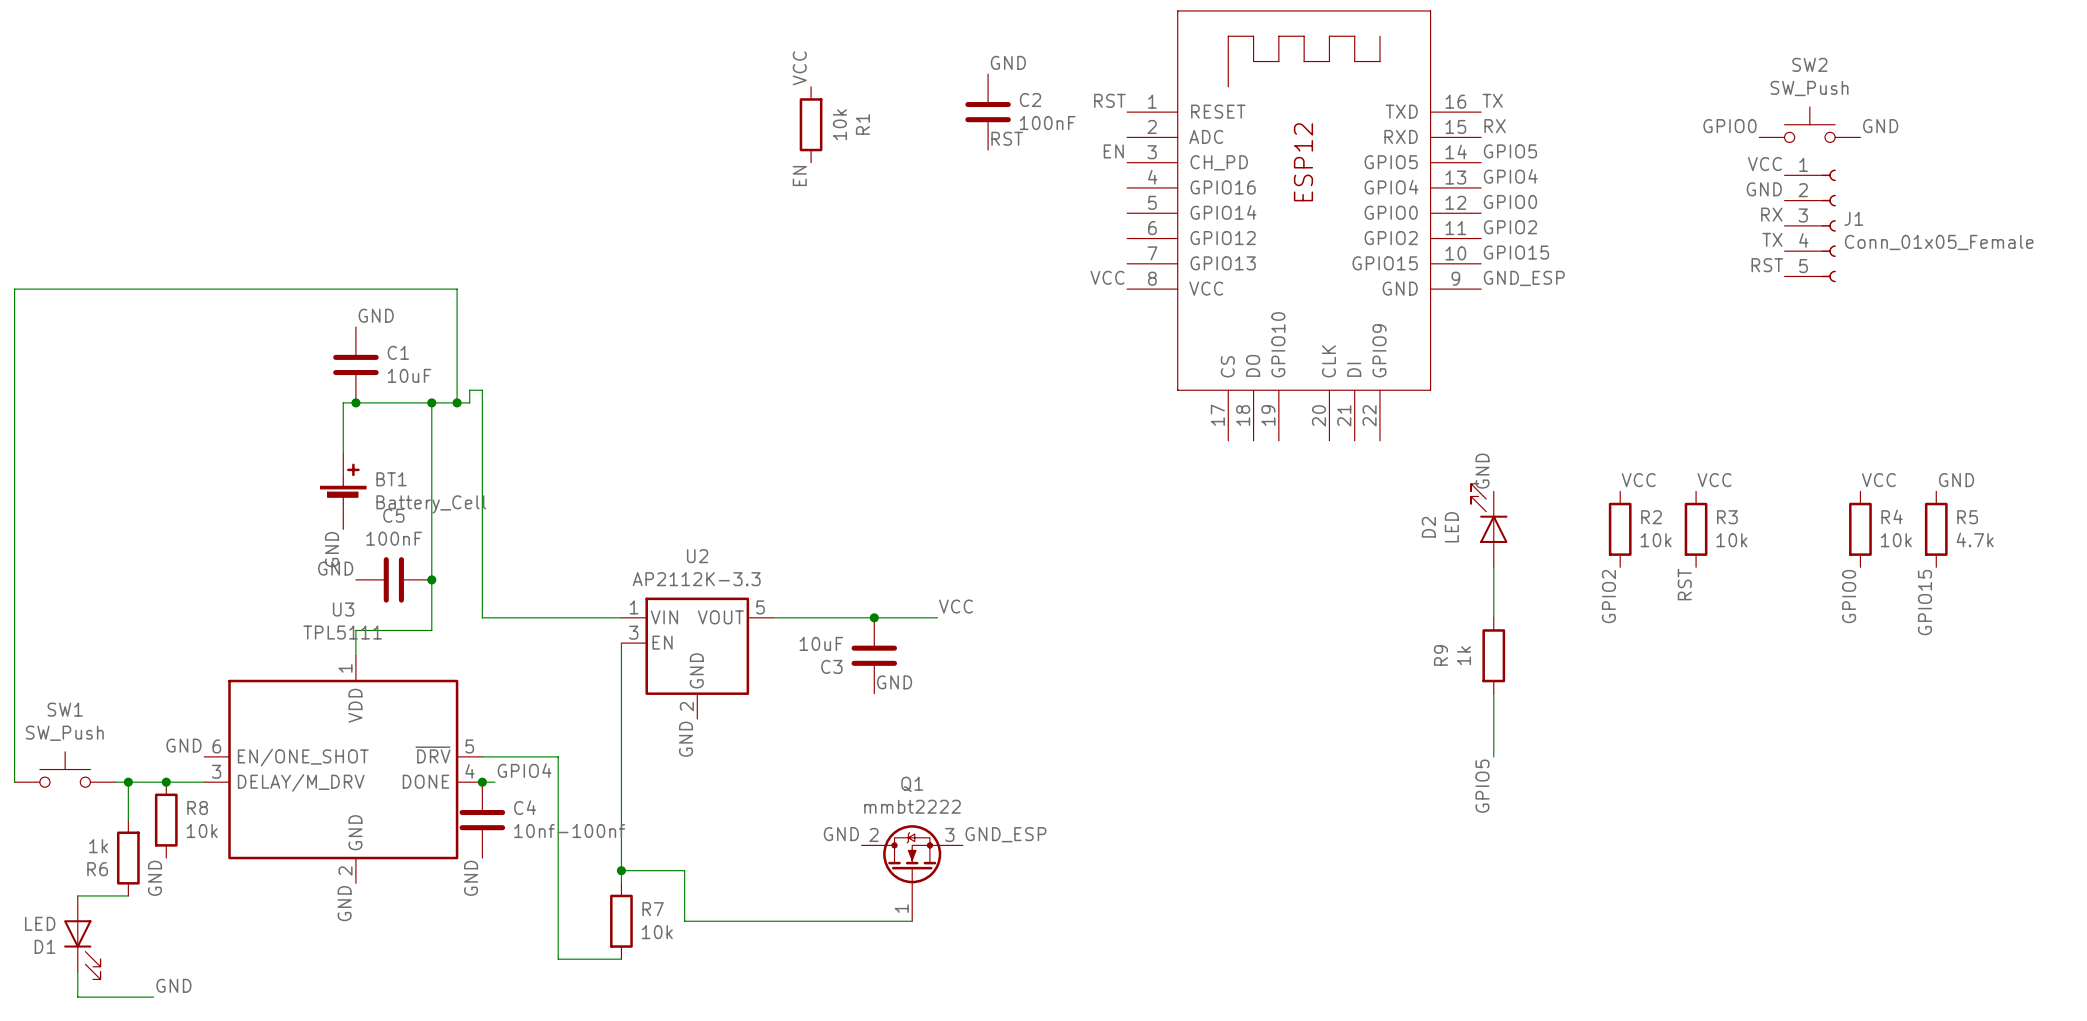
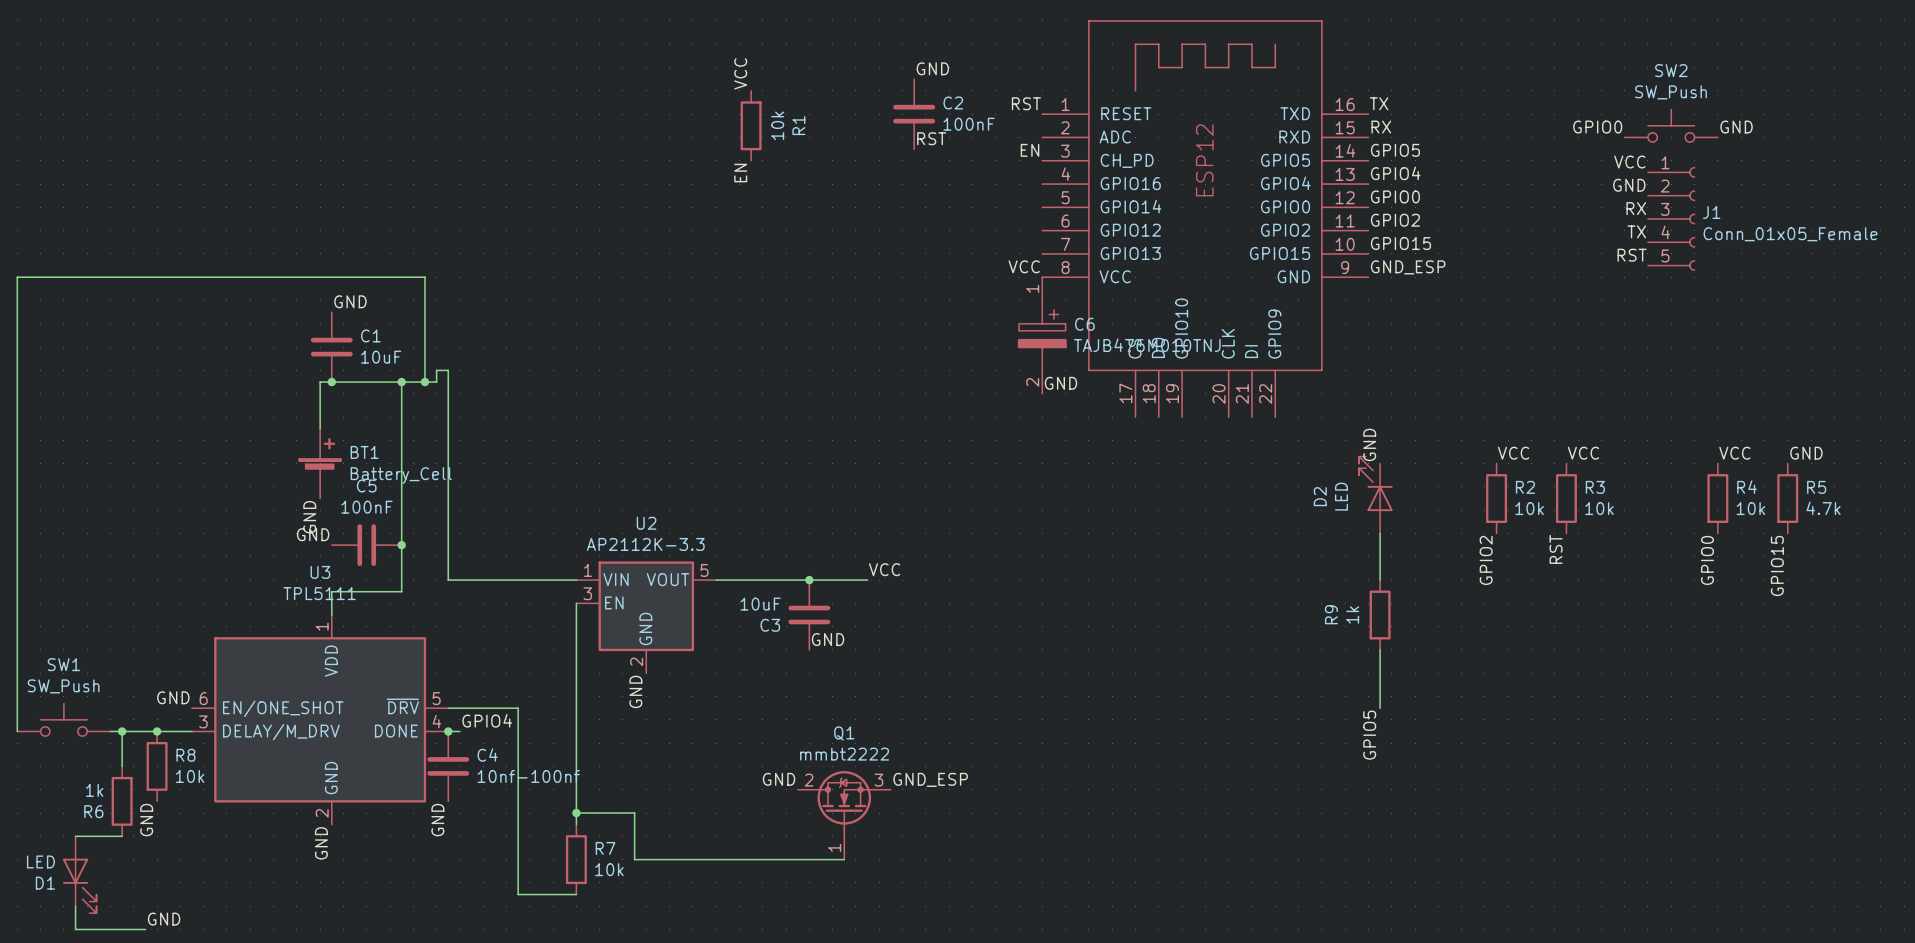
C6: none -> TAJB476M010TNJ (1042, 335)
label: none -> GND (1060, 383)

